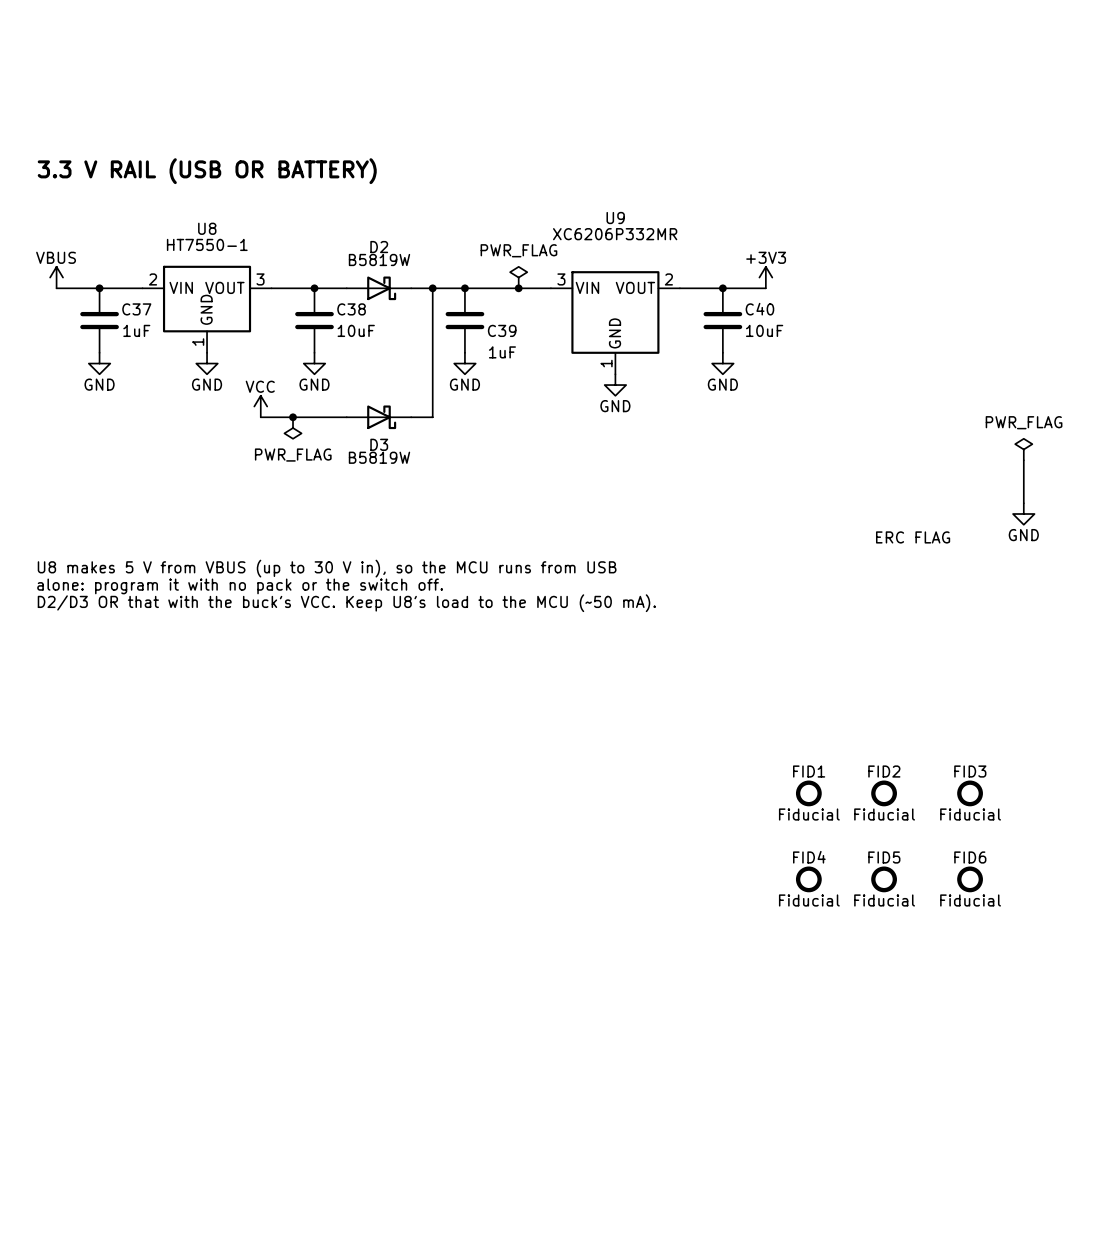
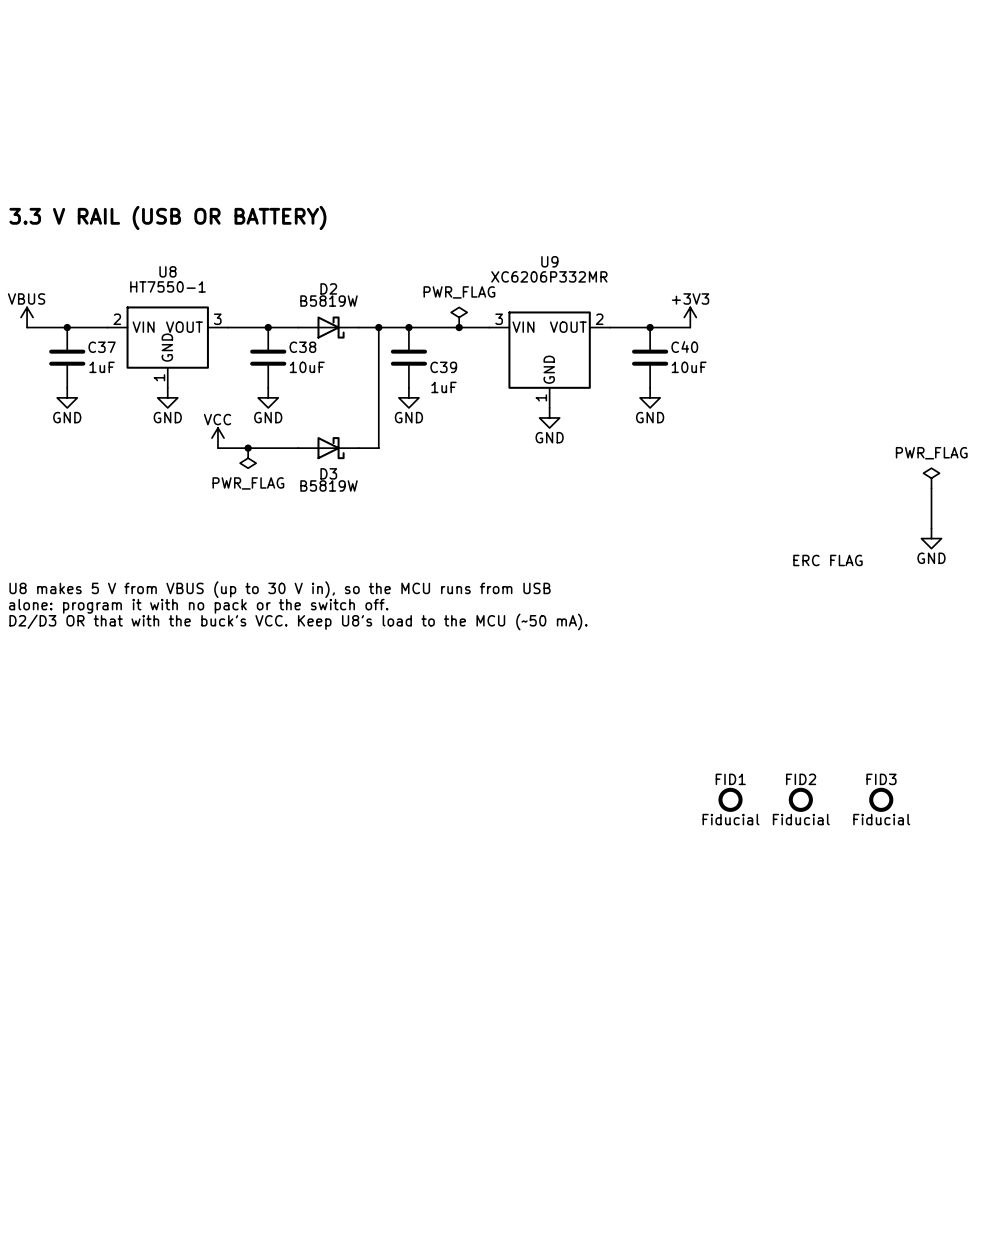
FID4: Fiducial (808, 879) -> none
FID5: Fiducial (884, 879) -> none
FID6: Fiducial (970, 879) -> none

